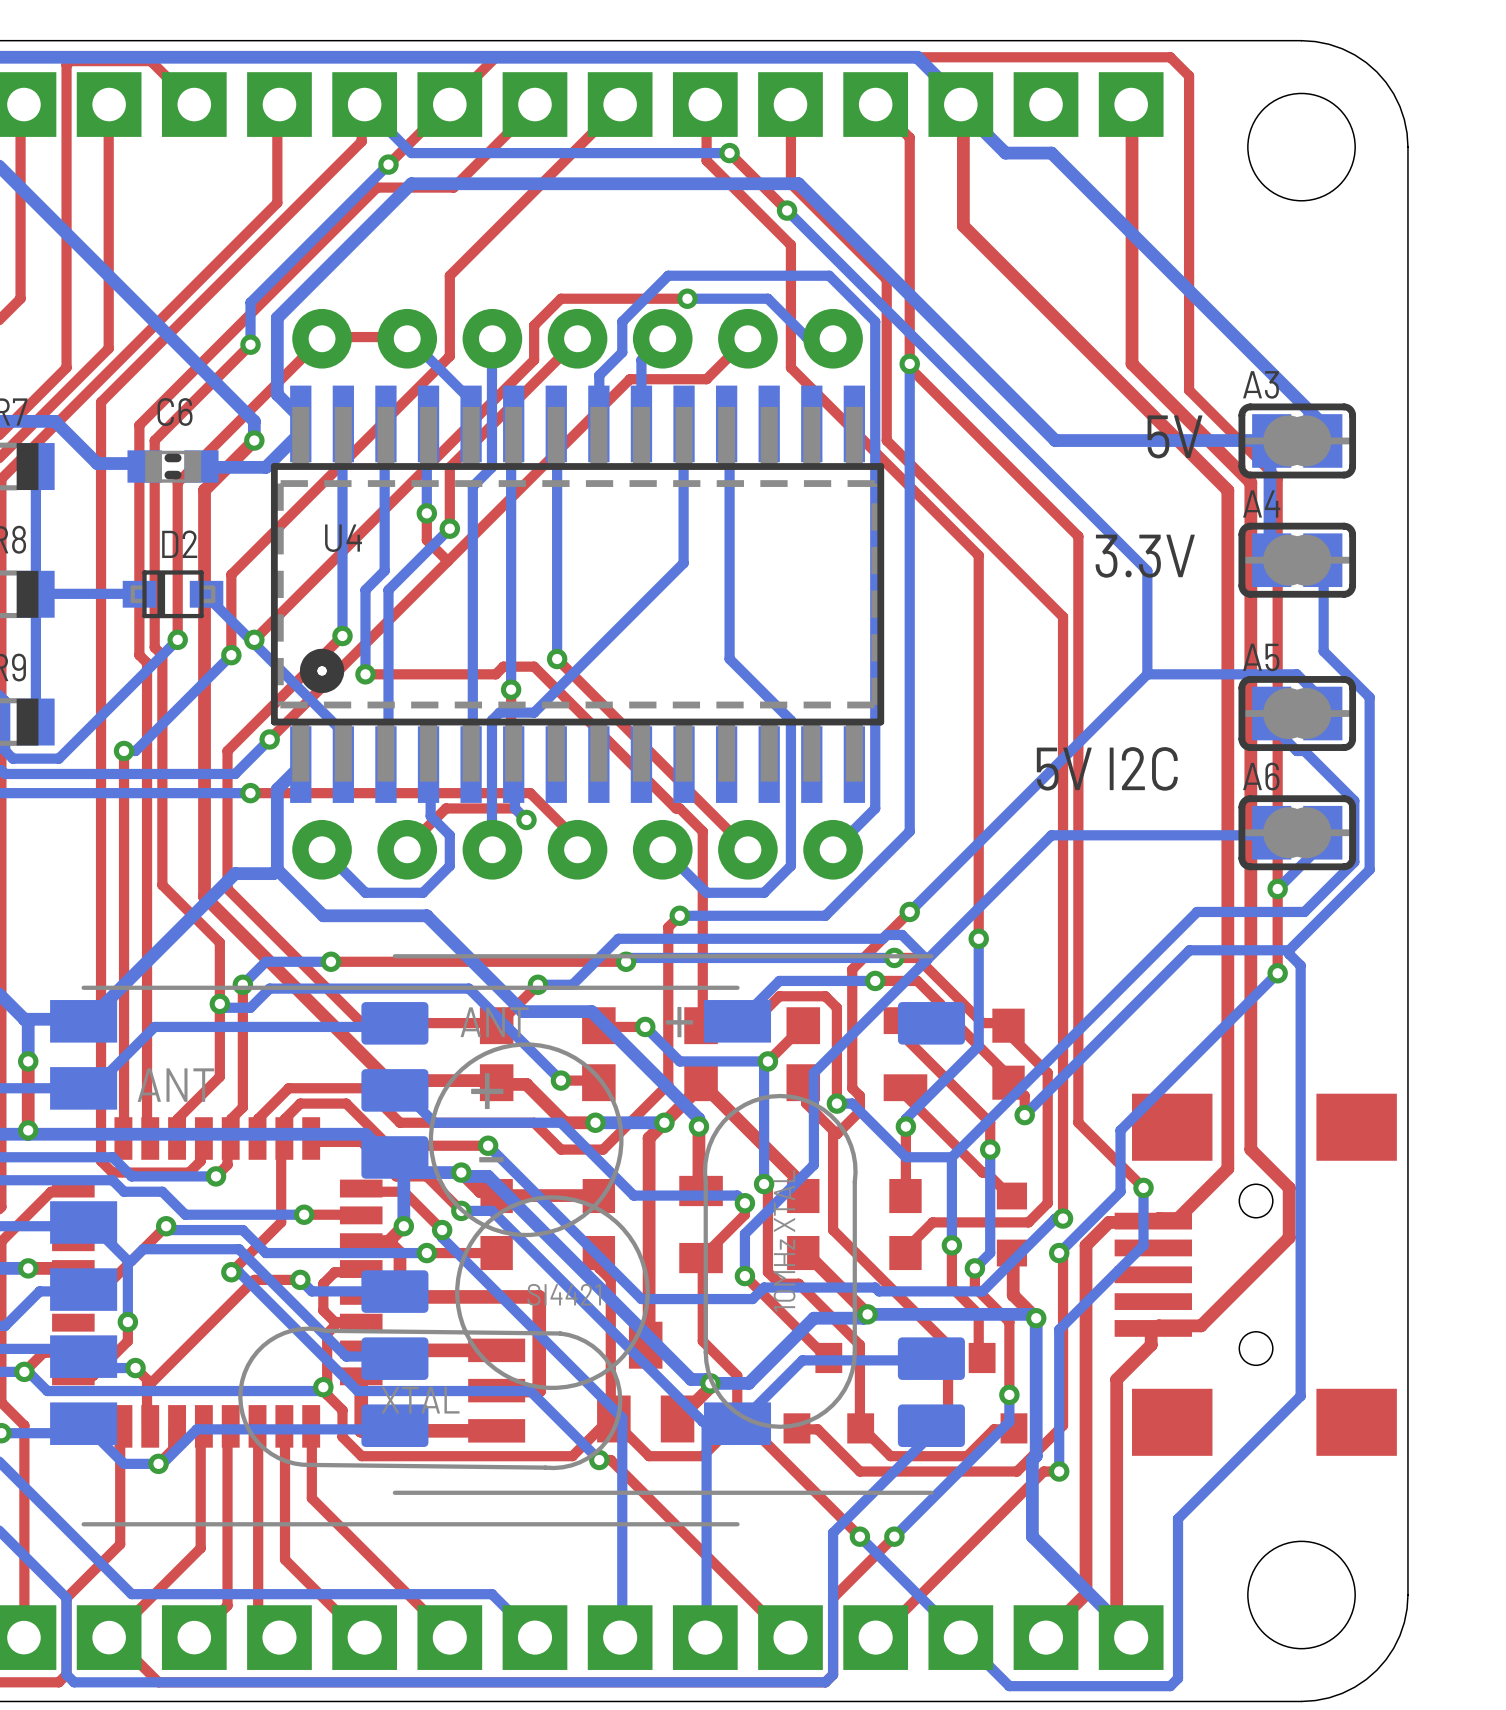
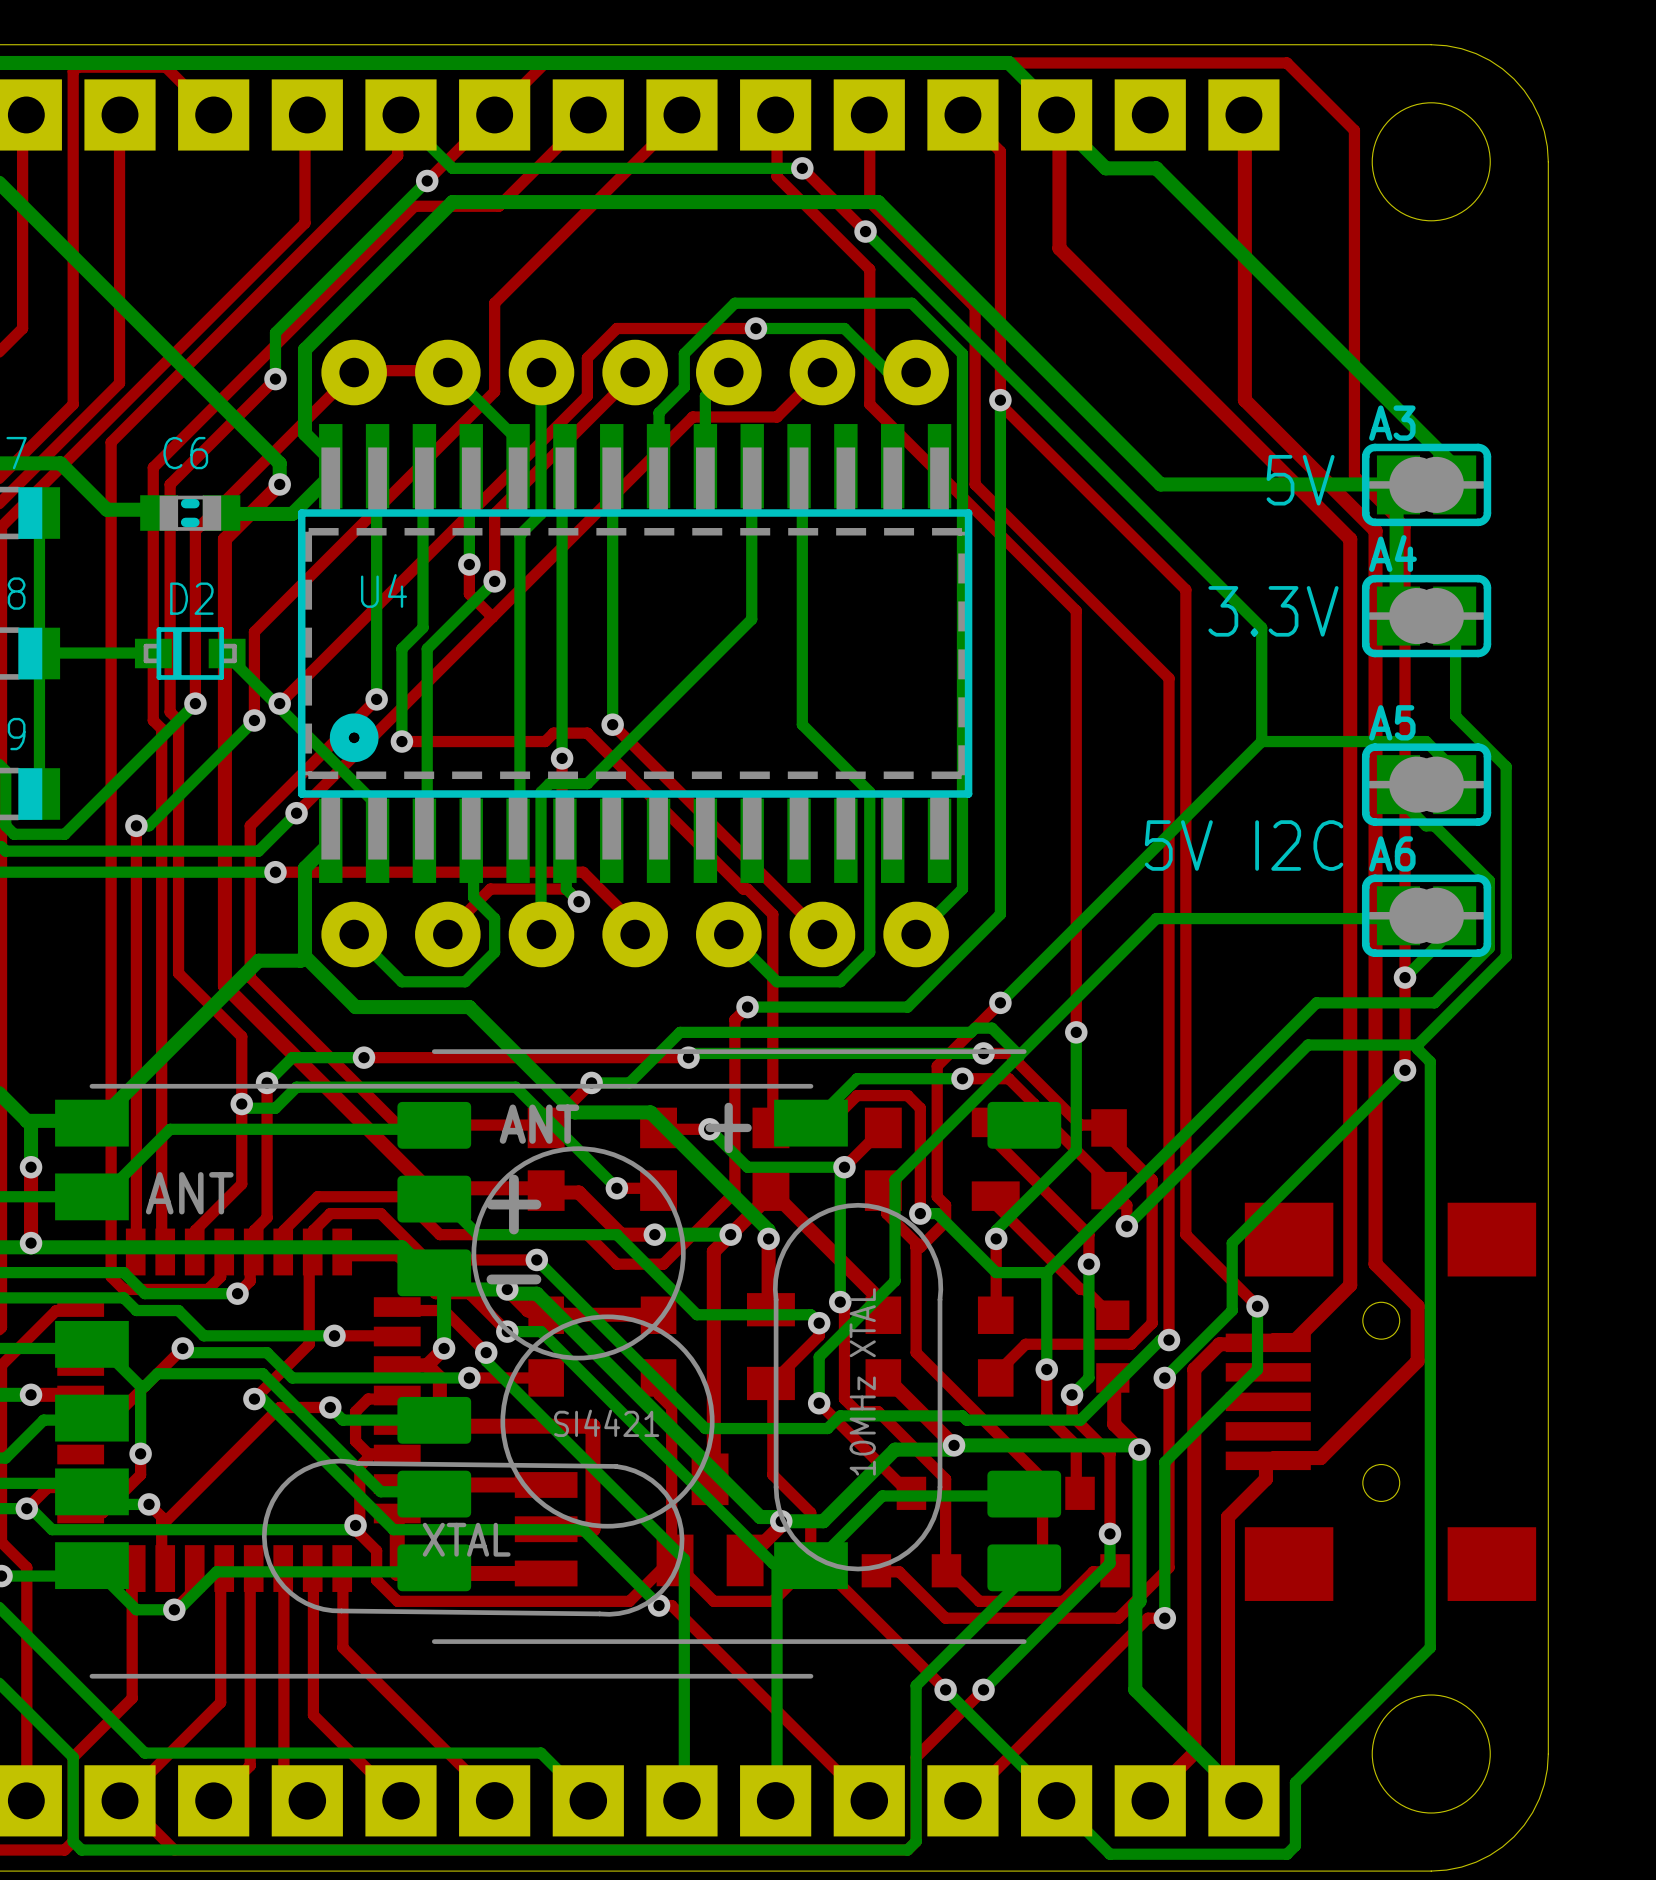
top track: (1189, 76) (1189, 390) (1231, 432) -> (1307, 83) (1354, 130) (1354, 476)
bottom track: (1300, 1396) (1178, 1518) (1178, 1620) -> (1430, 1535) (1430, 1647) (1295, 1782)

